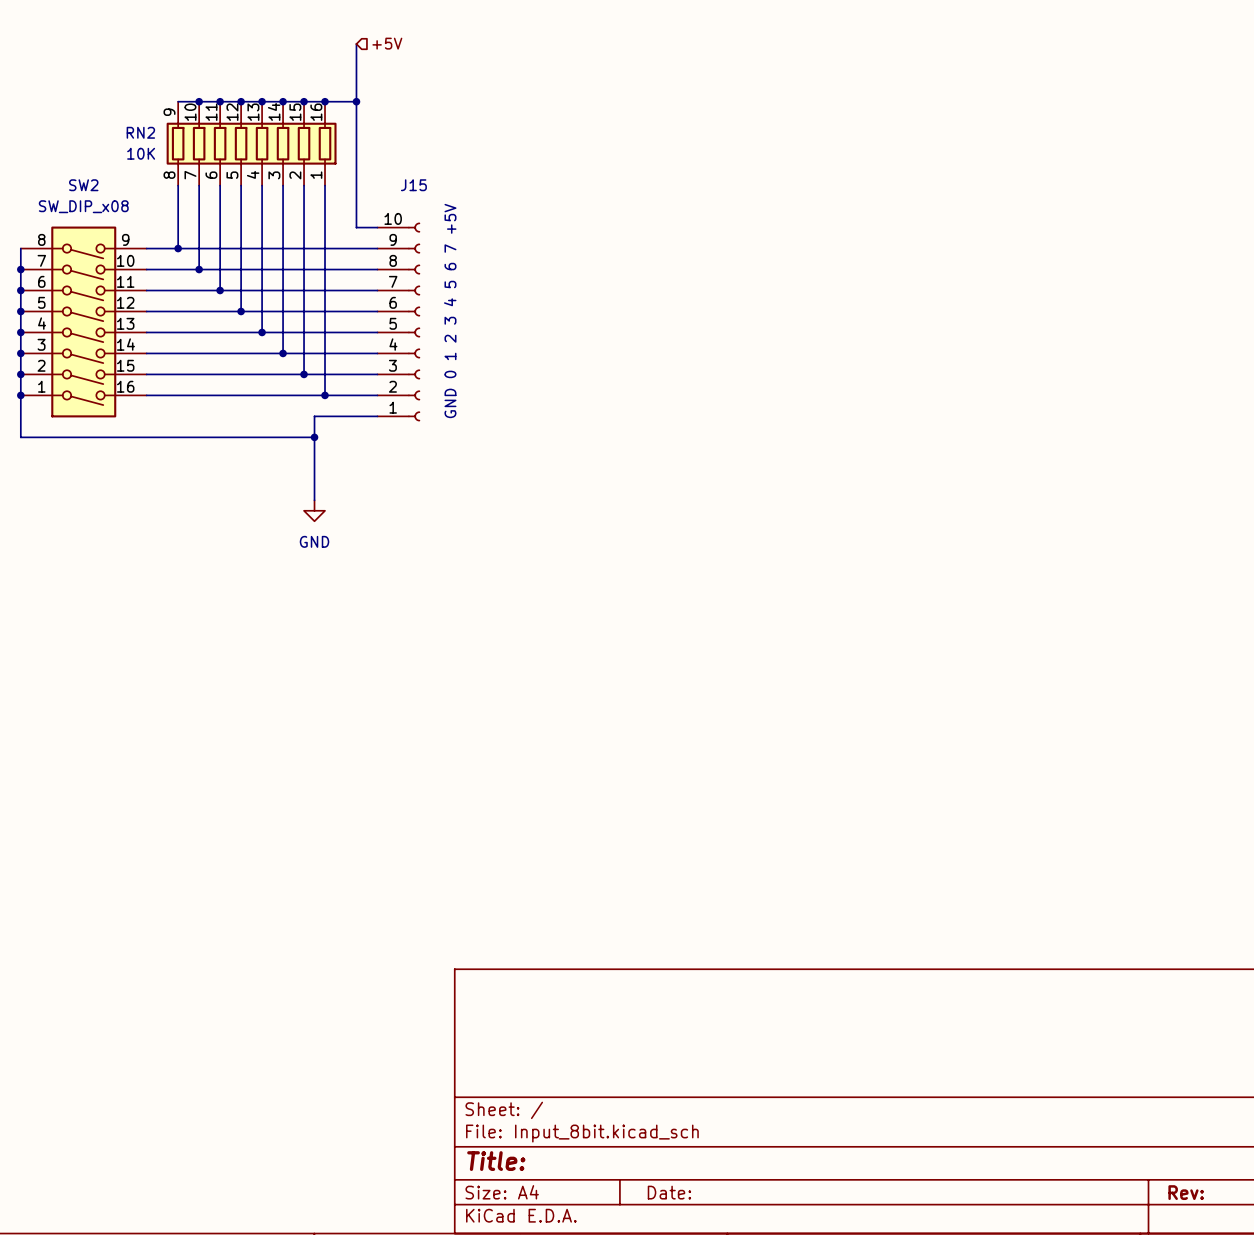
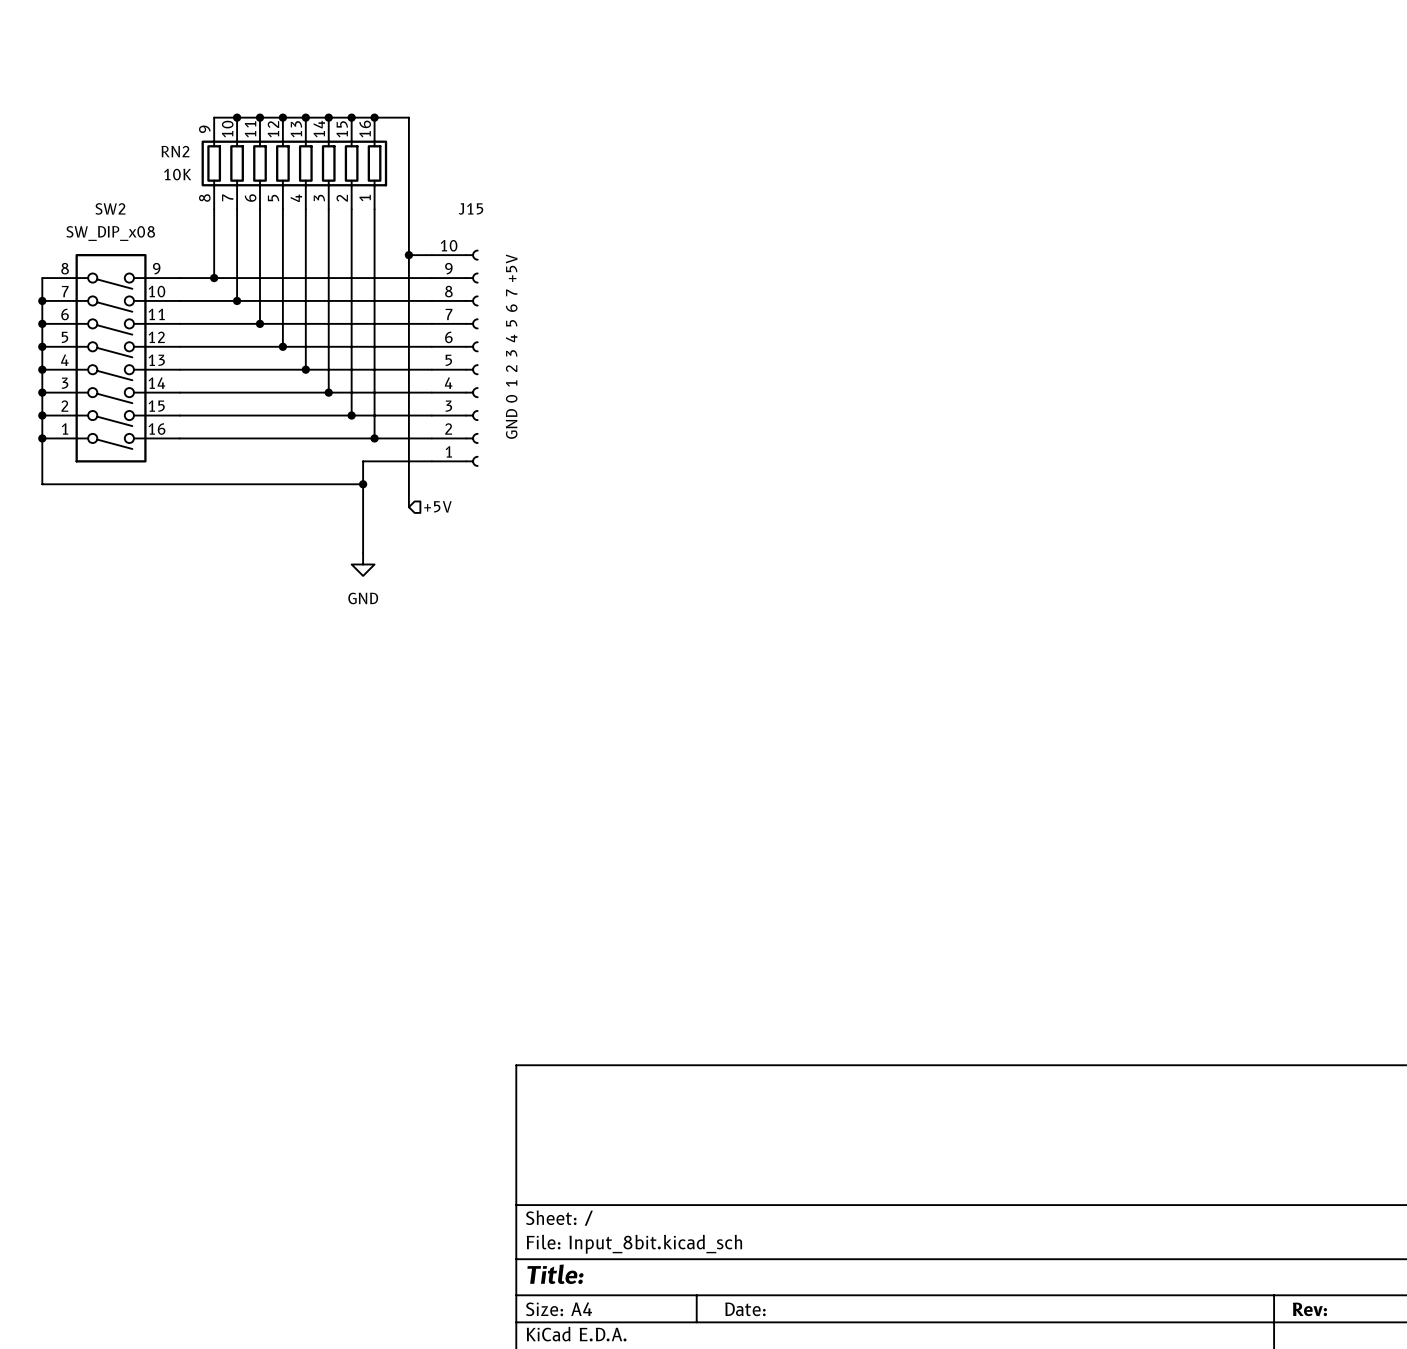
hierarchical label: +5V (387, 43) -> none
wire: (356, 44) (356, 101) -> none
junction: (356, 101) -> none
wire: none -> (408, 255) (408, 507)
junction: none -> (408, 255)
hierarchical label: none -> +5V (437, 506)

